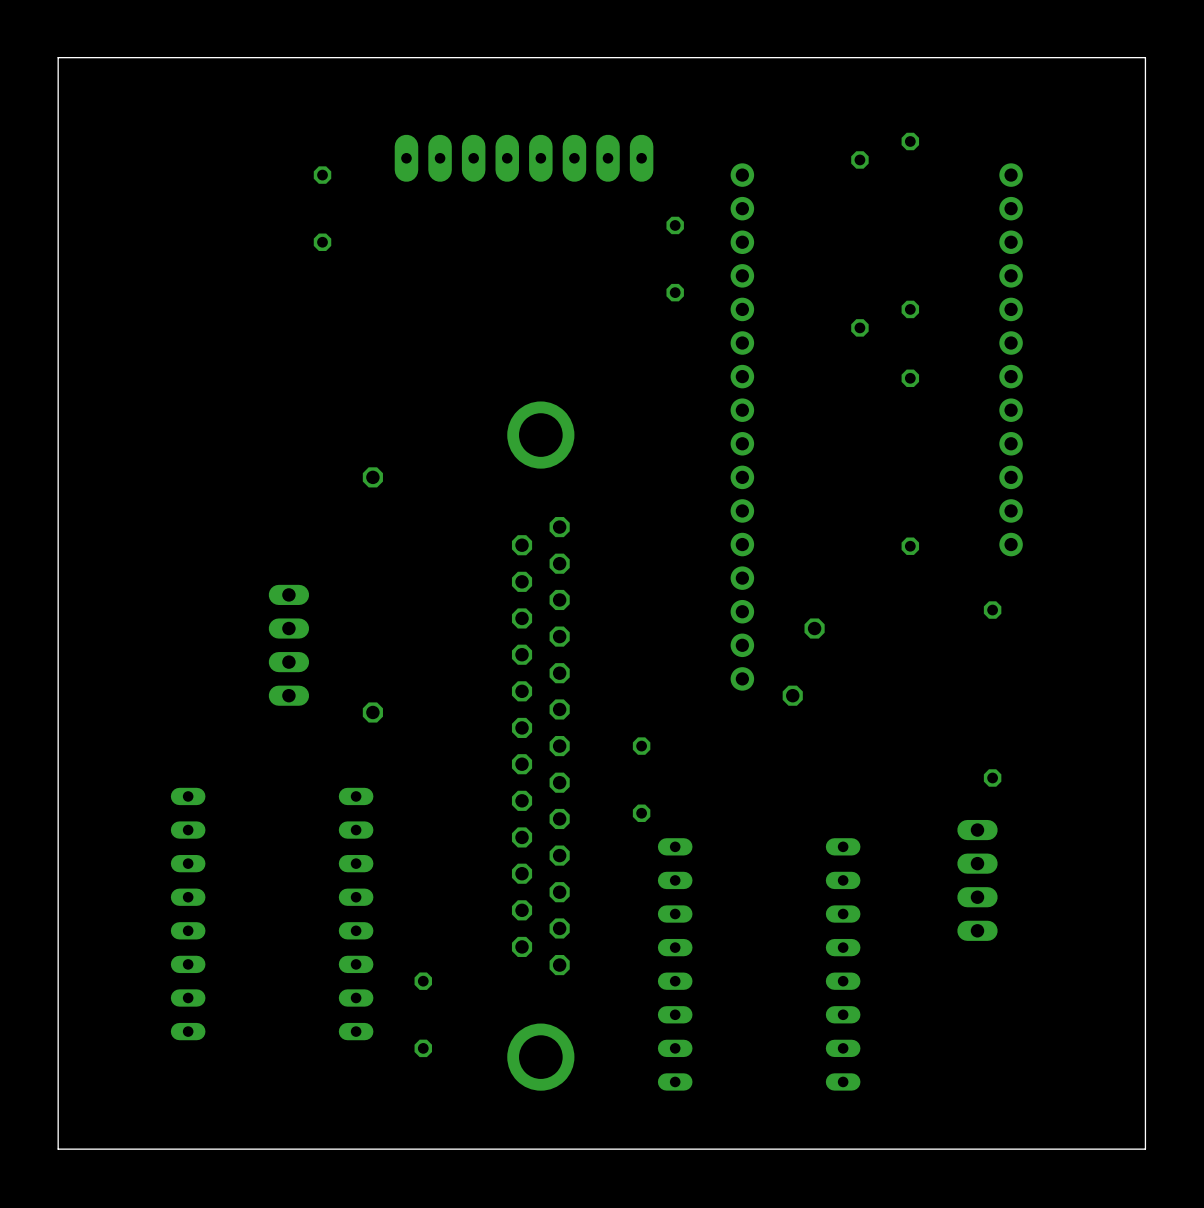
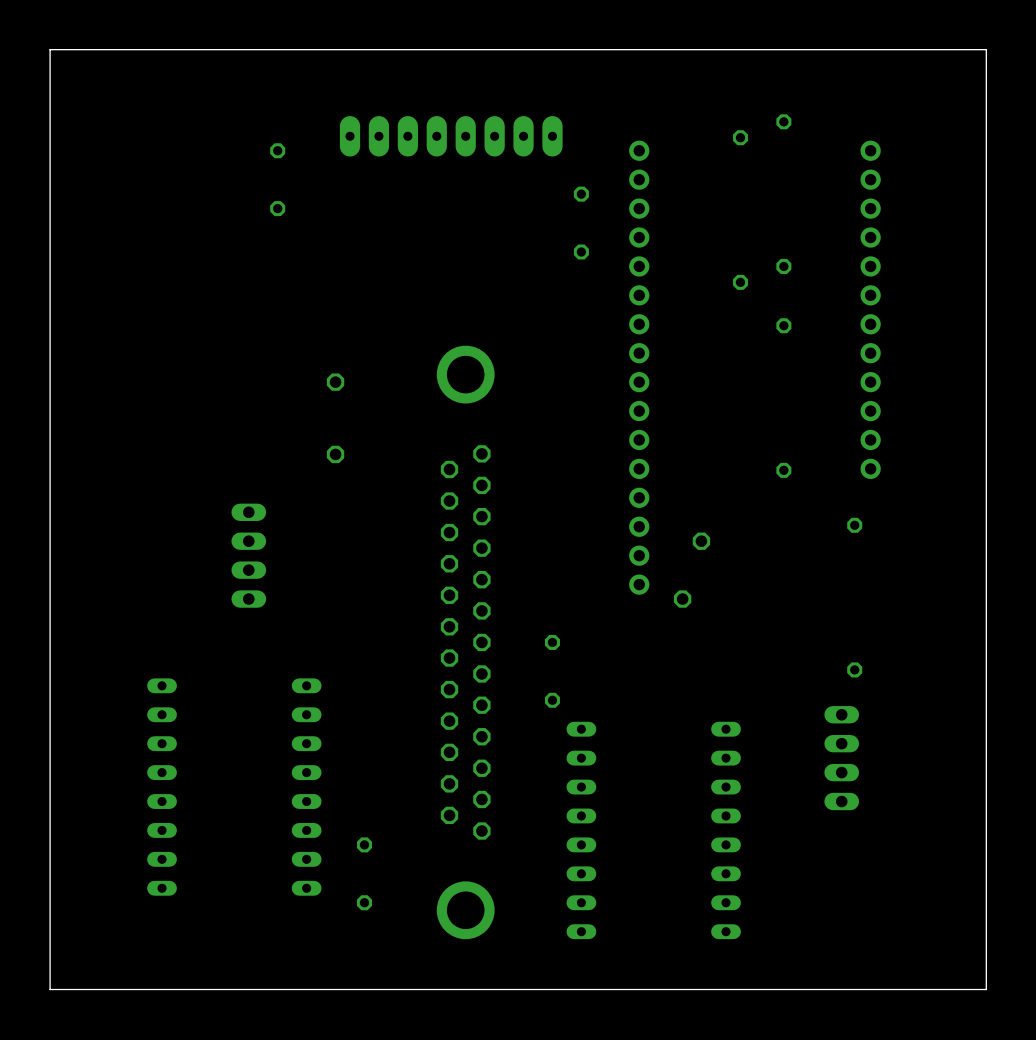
part: none -> (335, 382)
part: (372, 477) -> none
part: none -> (335, 454)
part: (372, 712) -> none

